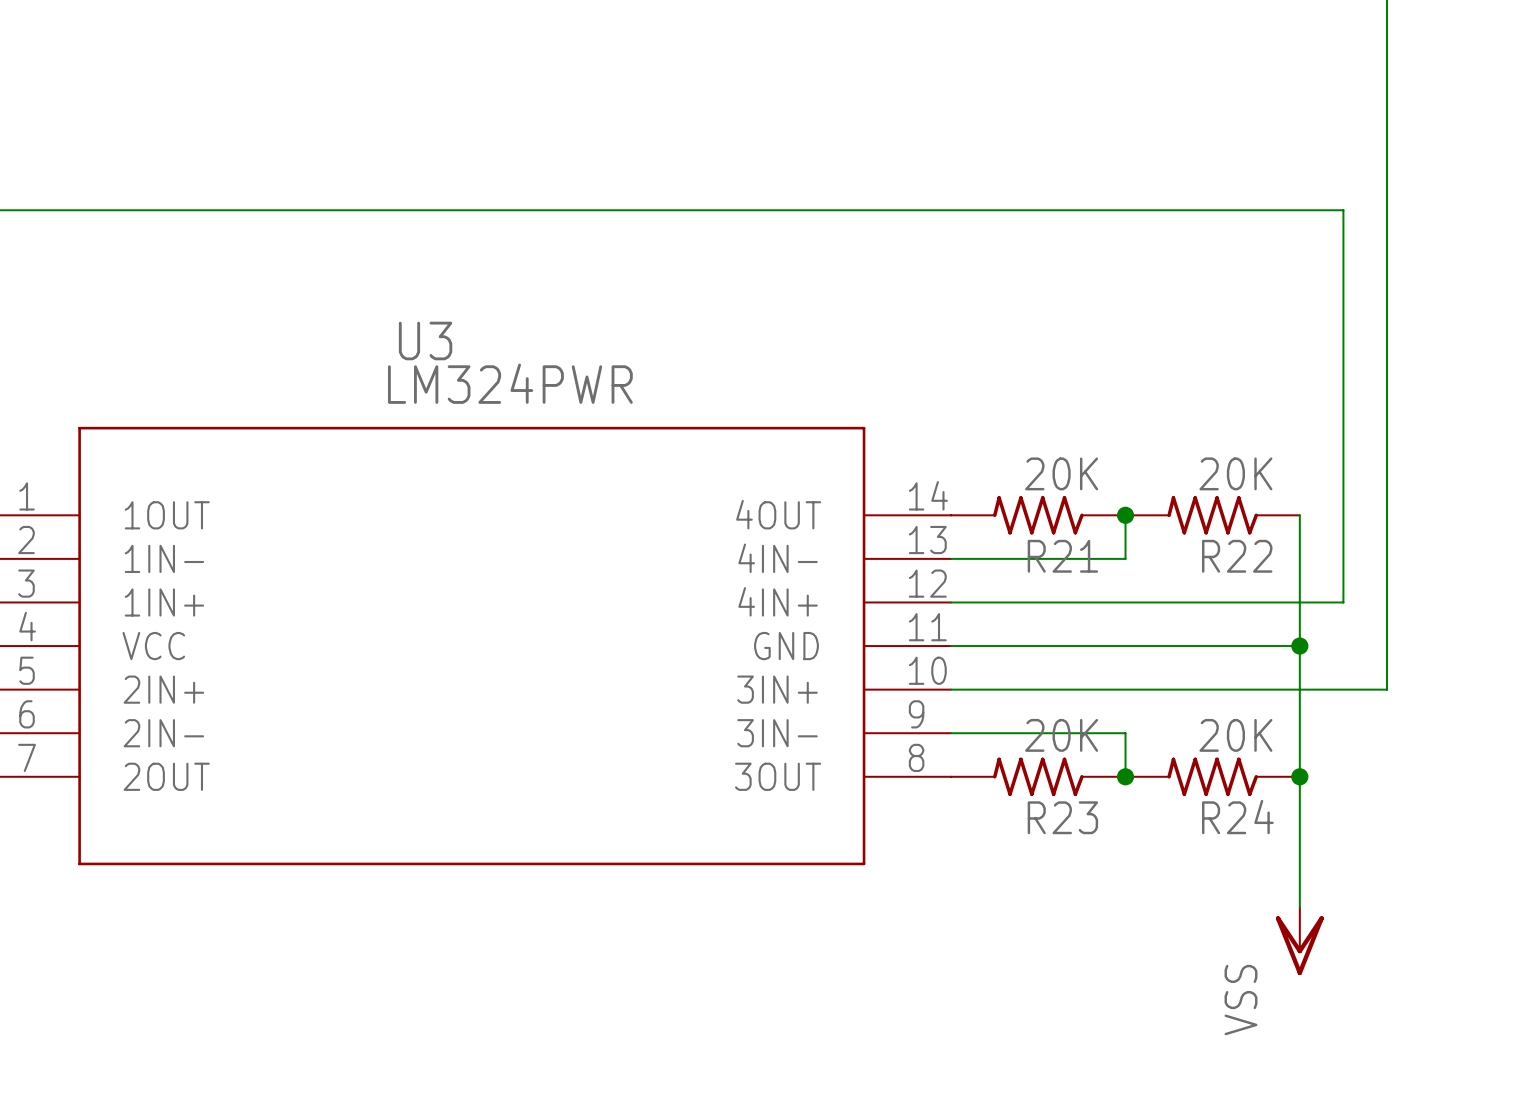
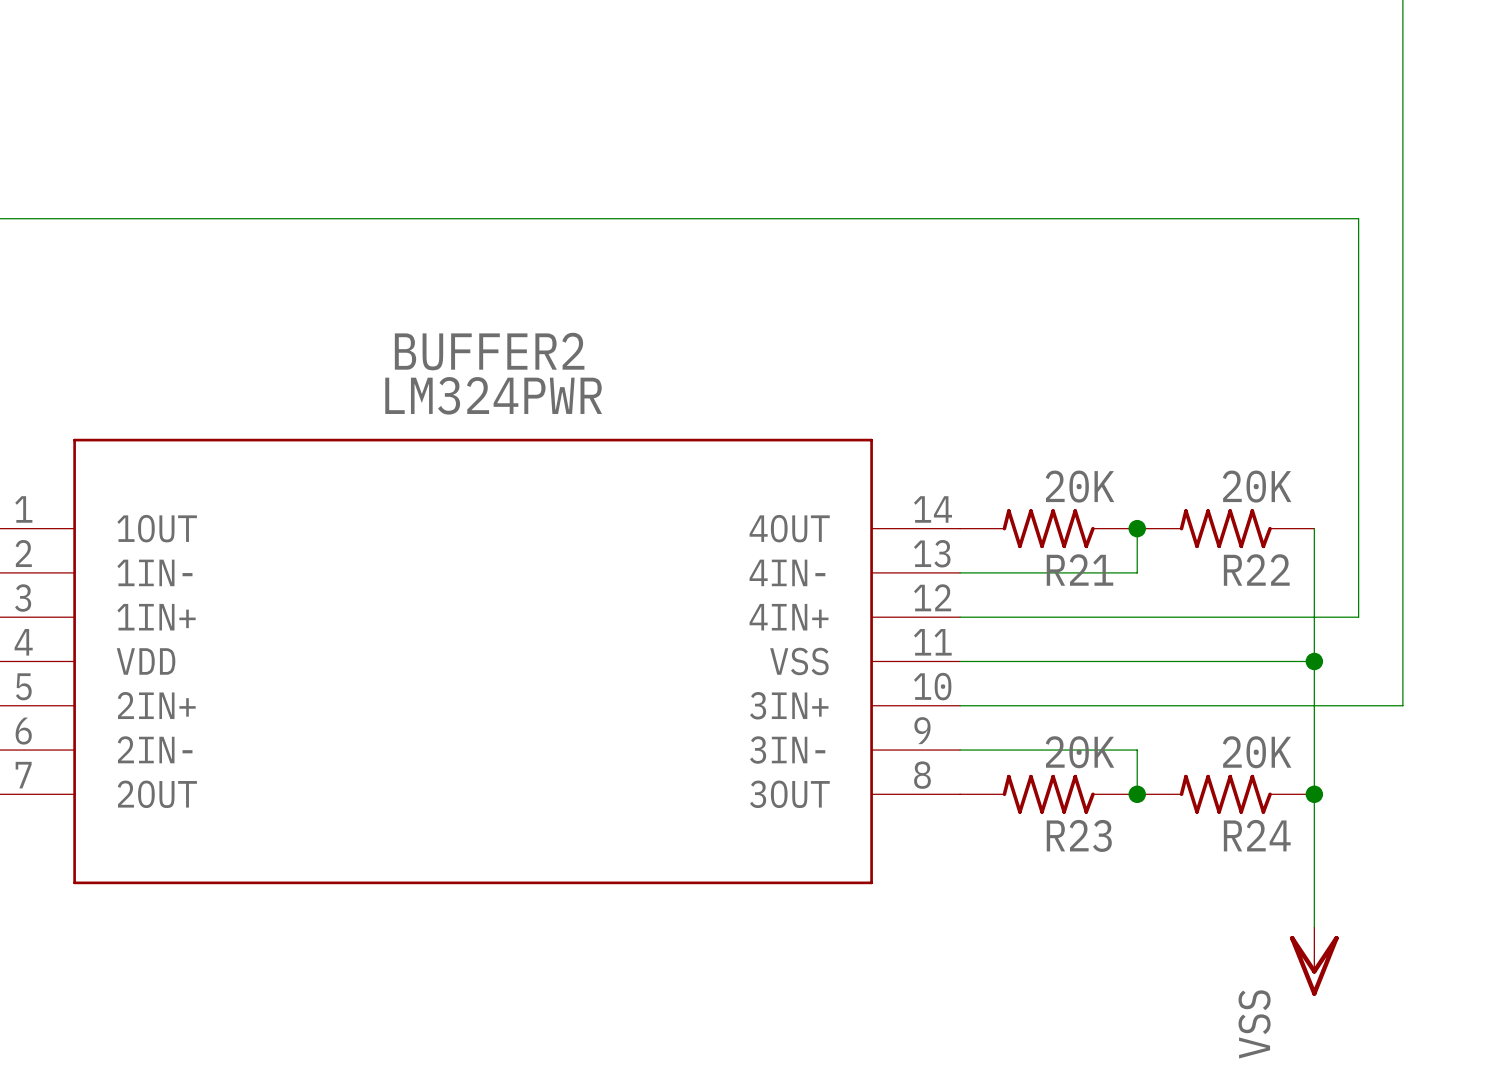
U3 name: U3 (425, 340) -> BUFFER2 (489, 351)
U3 pin name: VCC (153, 646) -> VDD (146, 661)
U3 pin name: GND (786, 646) -> VSS (799, 661)

